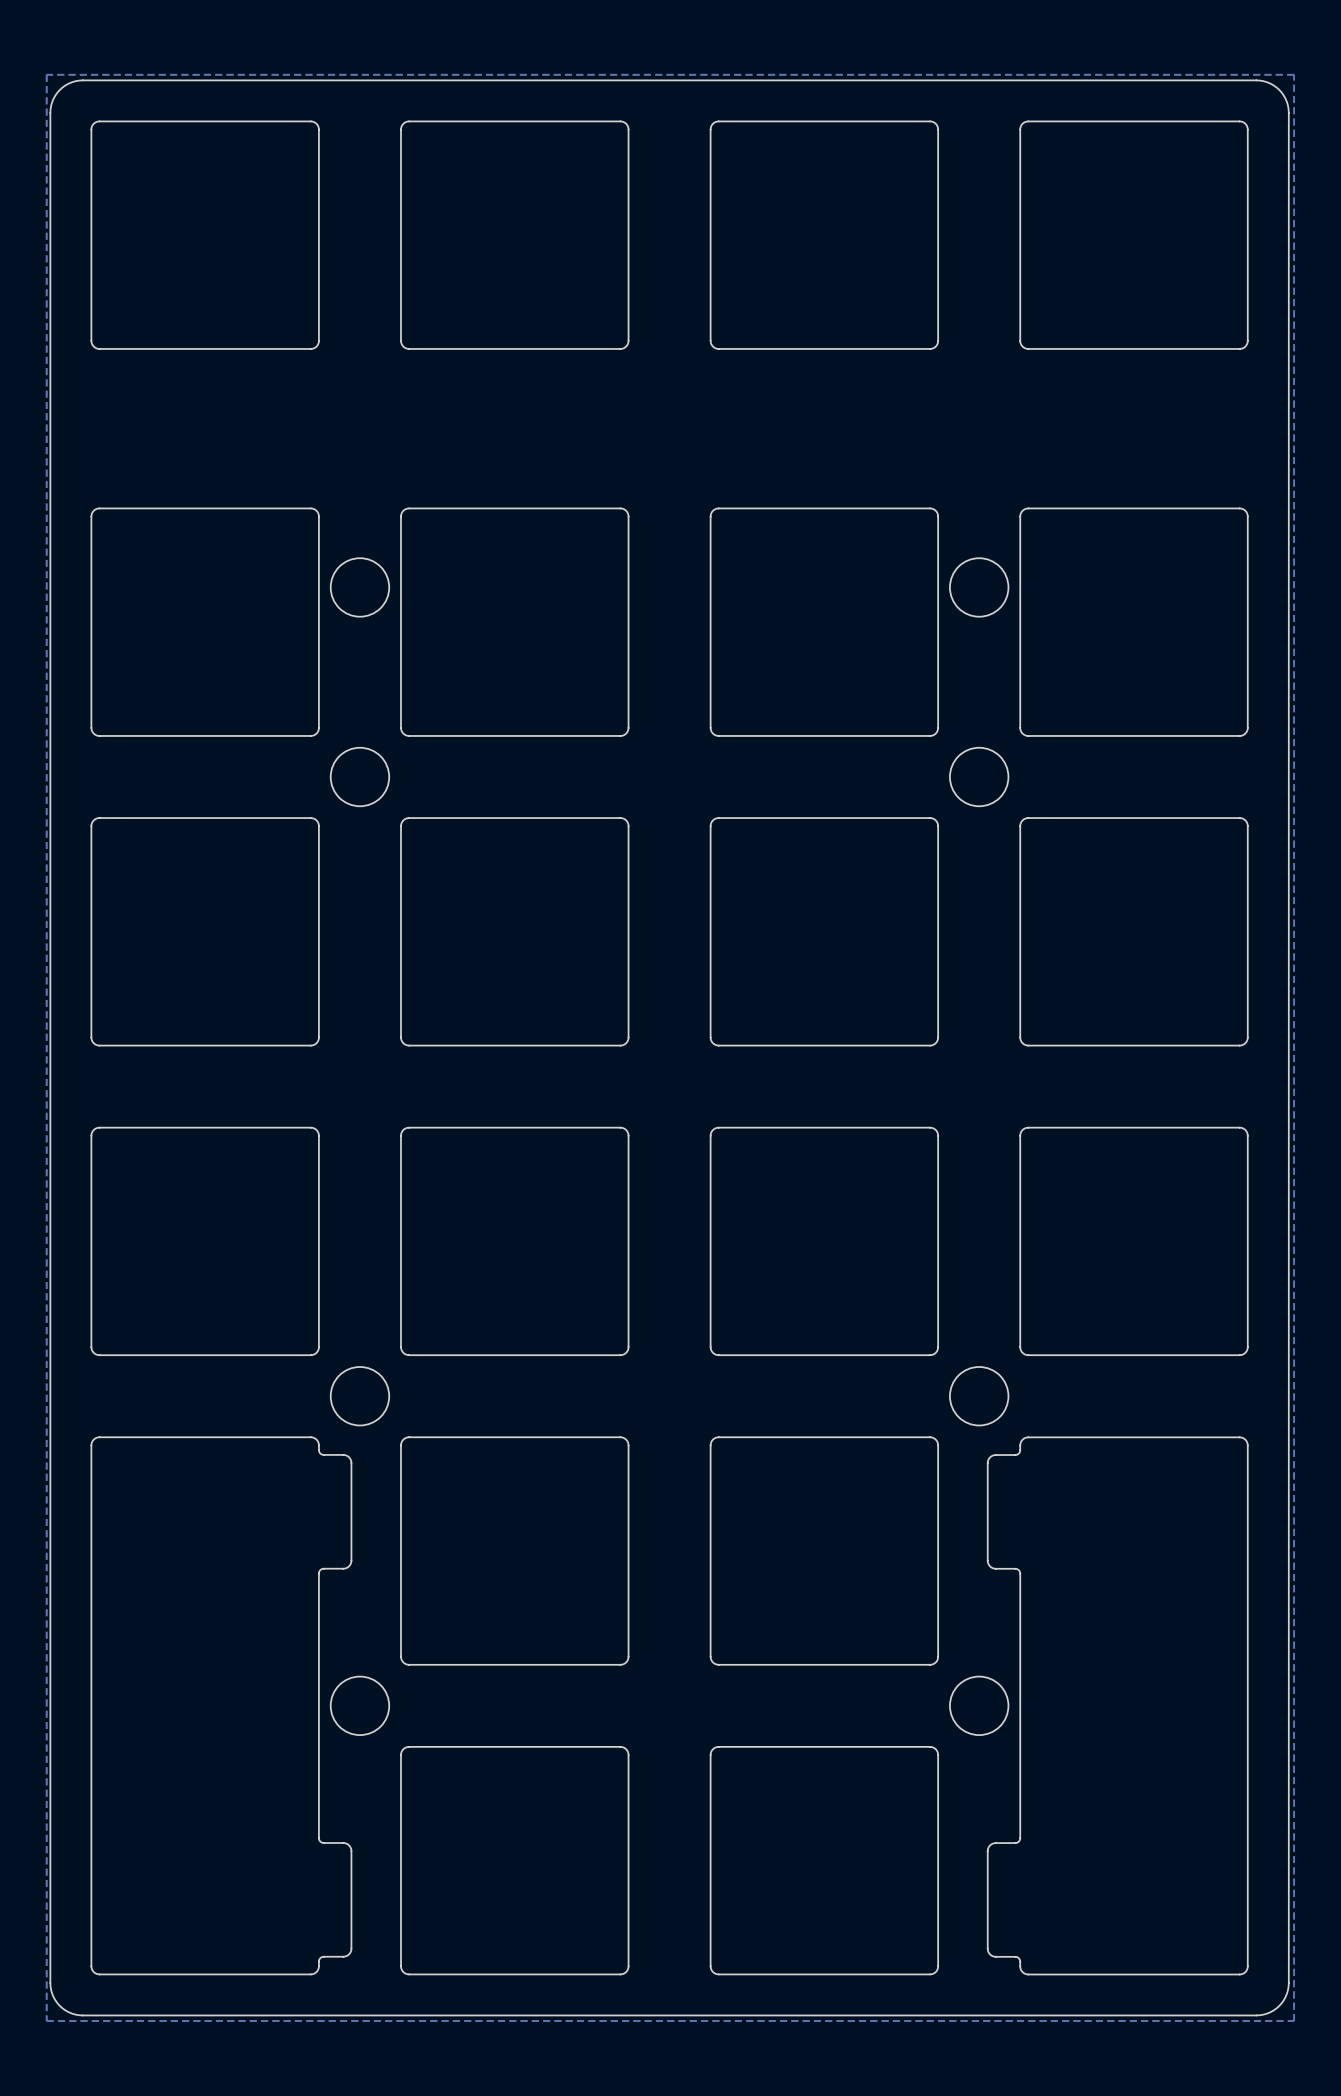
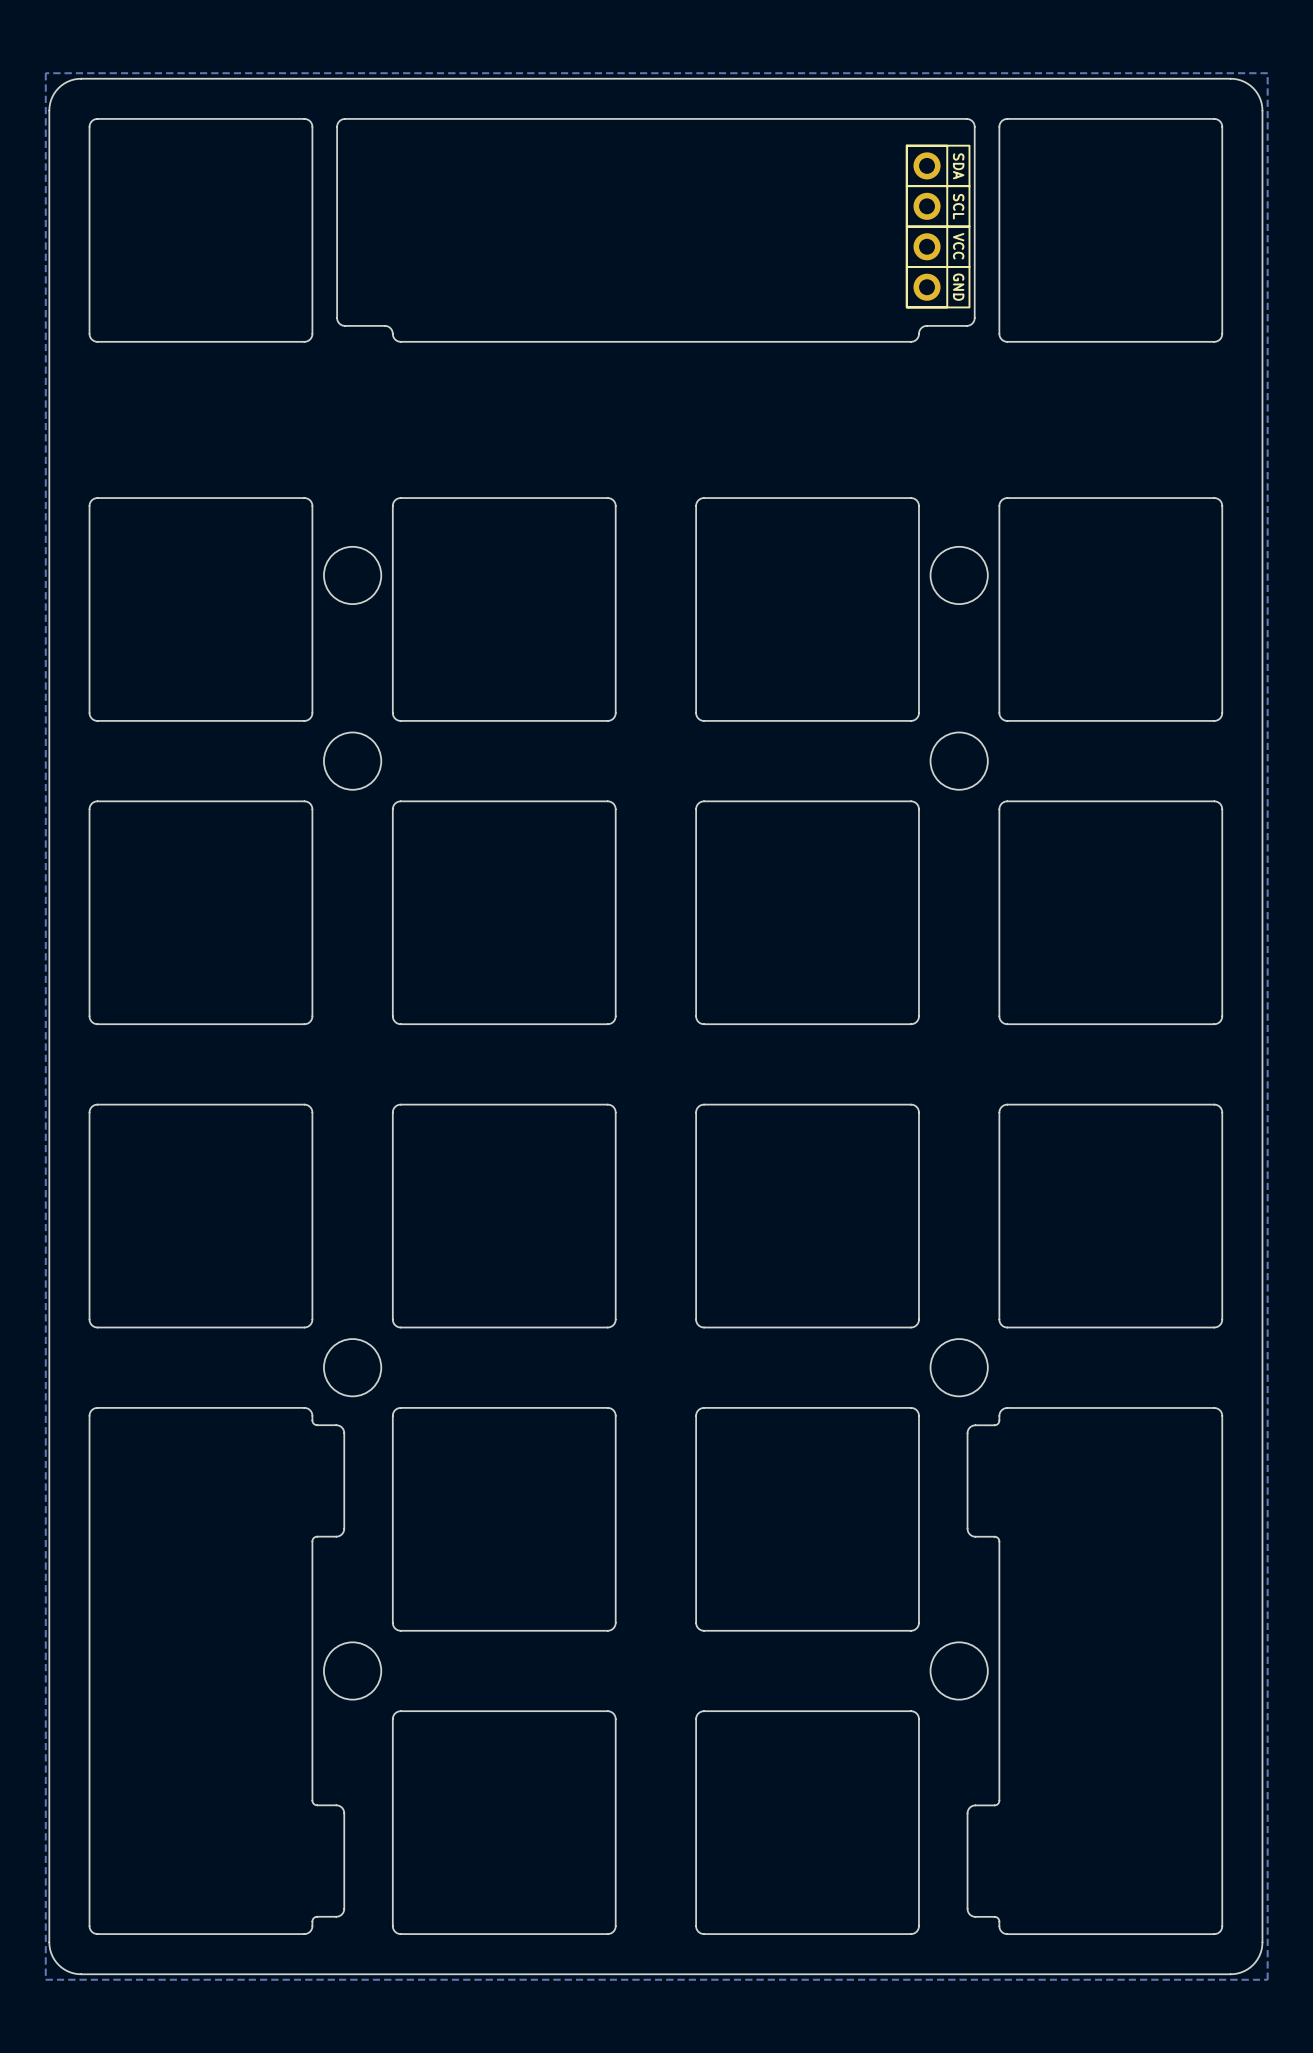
board edge: (409, 121) (403, 123) (401, 129) (401, 340) -> (400, 118) (344, 119) (339, 121) (337, 126) (337, 320) (344, 325) (386, 326) (391, 329) (392, 333)
board edge: (620, 121) (626, 123) (628, 129) (628, 340) (626, 346) (620, 348) -> (704, 341) (607, 341)
board edge: (718, 121) (713, 123) (710, 129) (710, 340) (713, 346) (718, 348) -> (704, 118) (607, 118)
board edge: (930, 121) (935, 123) (938, 129) (938, 340) -> (911, 118) (967, 119) (973, 122) (974, 126) (974, 320) (967, 325) (924, 326) (920, 329) (918, 333)
part: none -> (938, 226)

